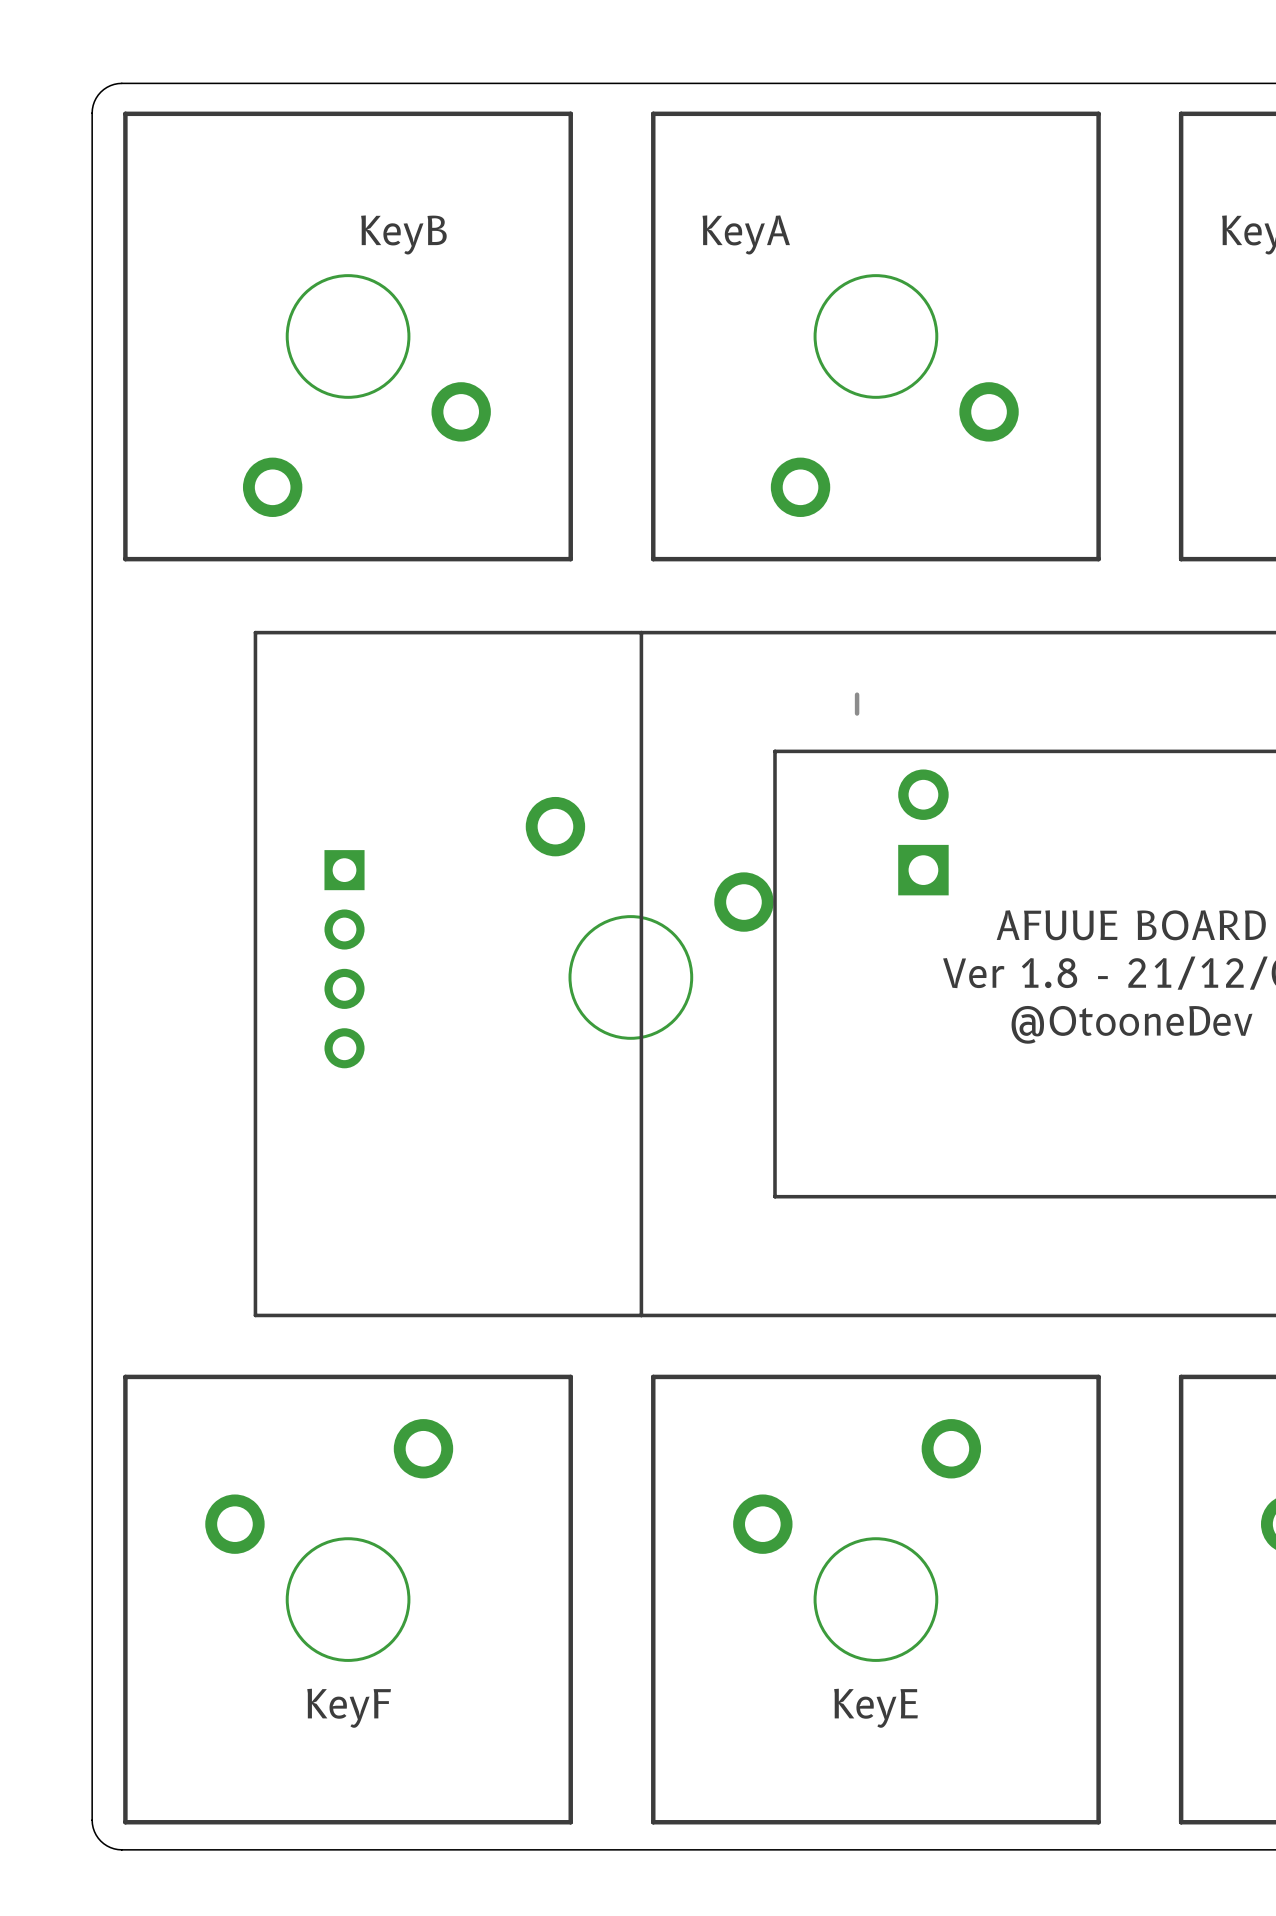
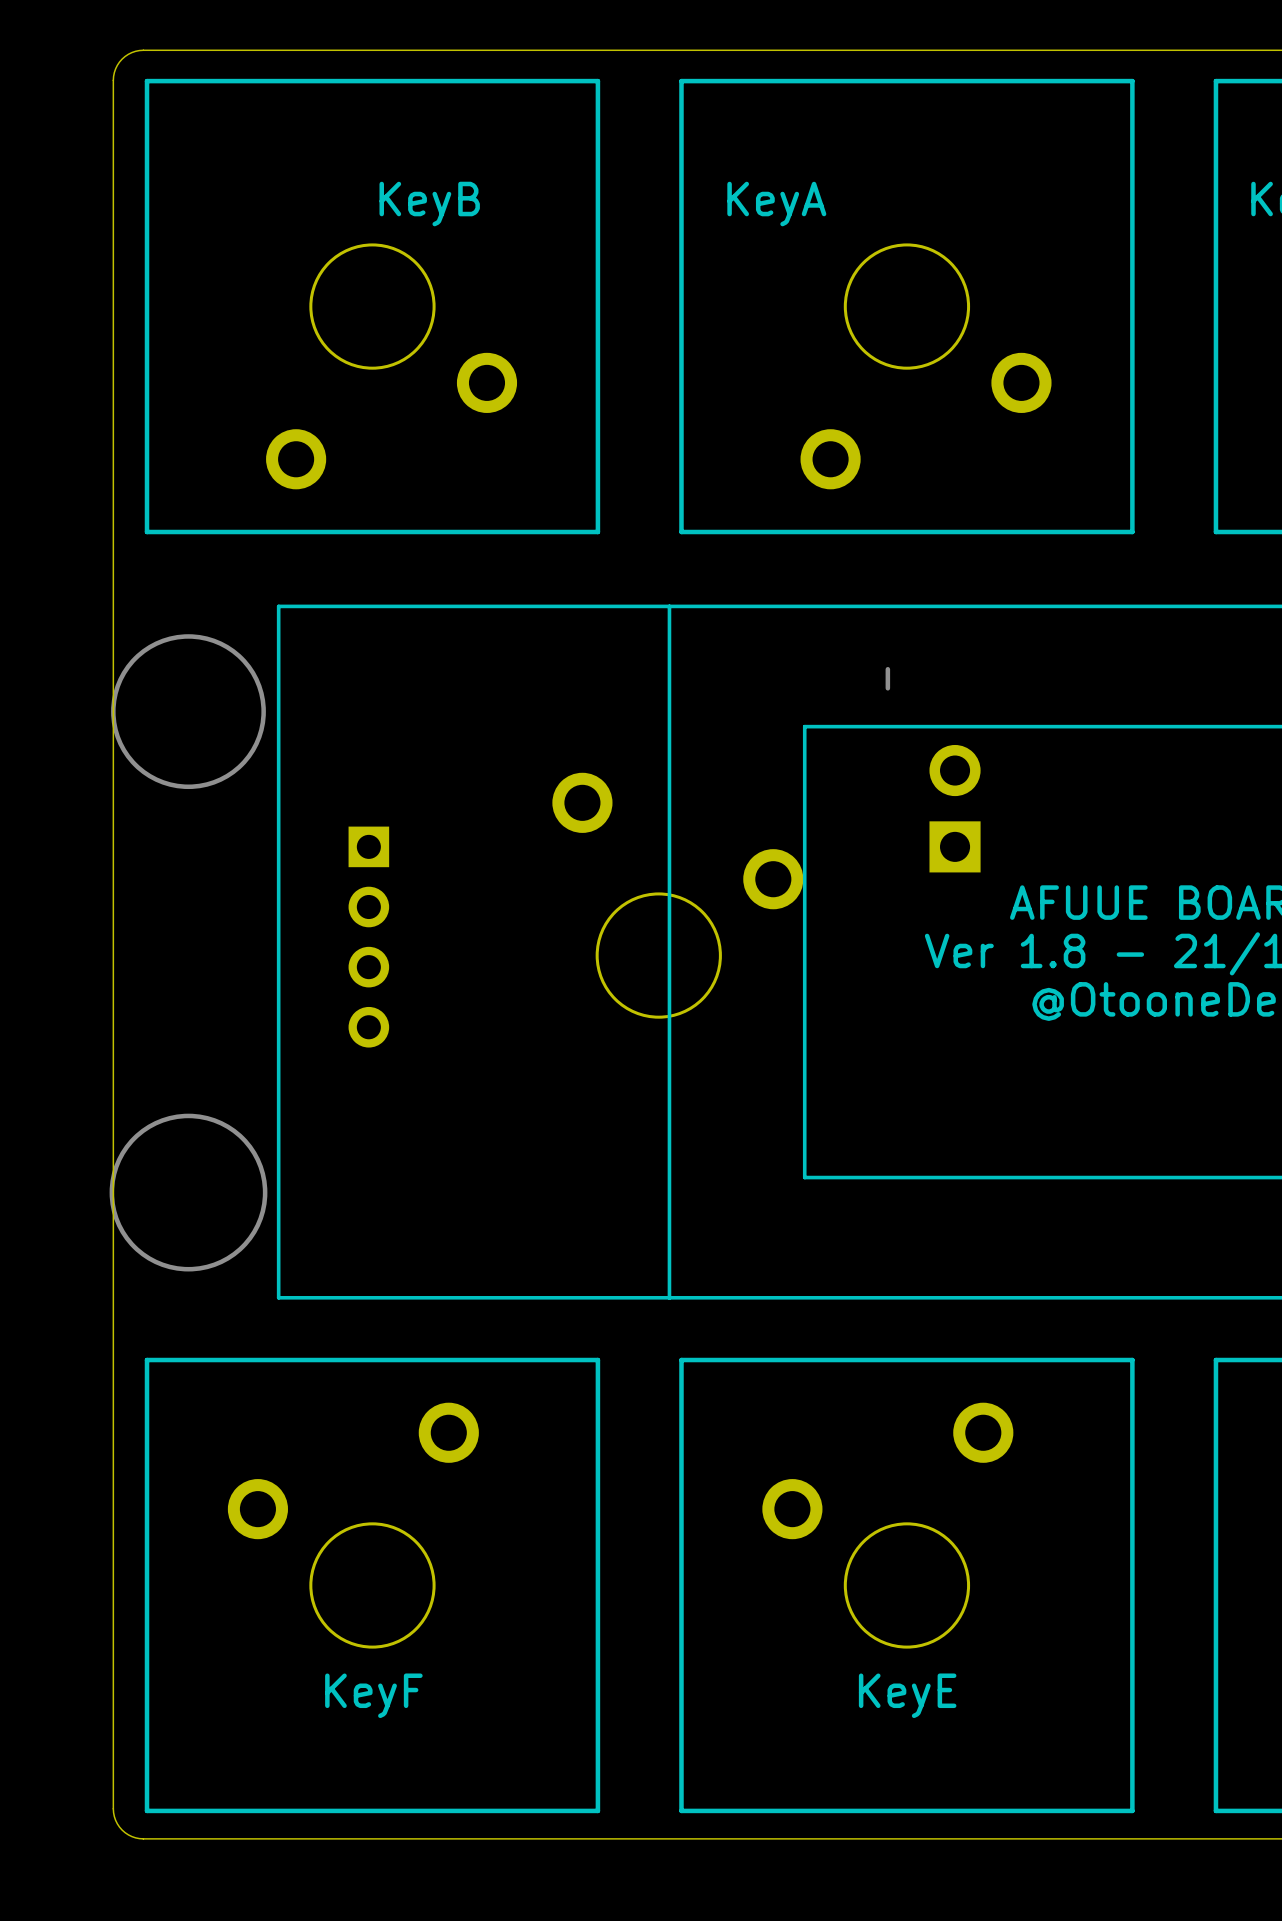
drawing: none -> [111, 634, 266, 790]
drawing: none -> [109, 1113, 268, 1272]

